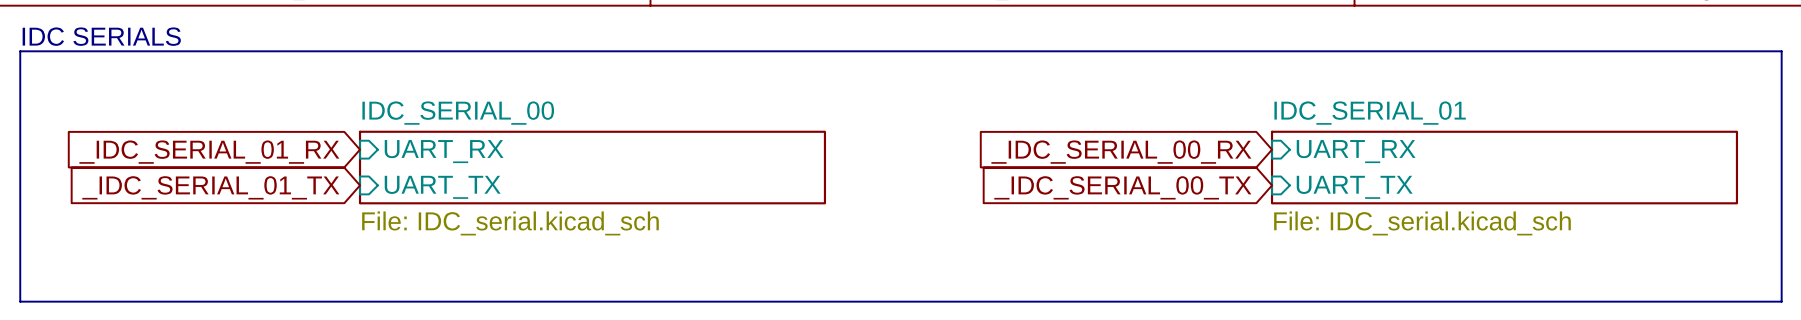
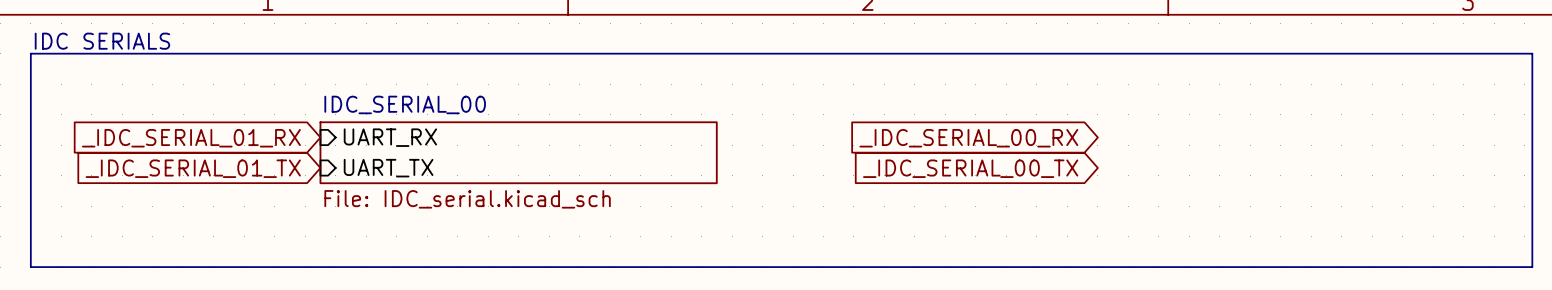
sheet pin: UART_RX (1356, 151) -> none
sheet IDC_SERIAL_01: File: IDC_serial.kicad_sch (1504, 167) -> none
sheet pin: UART_TX (1354, 187) -> none

